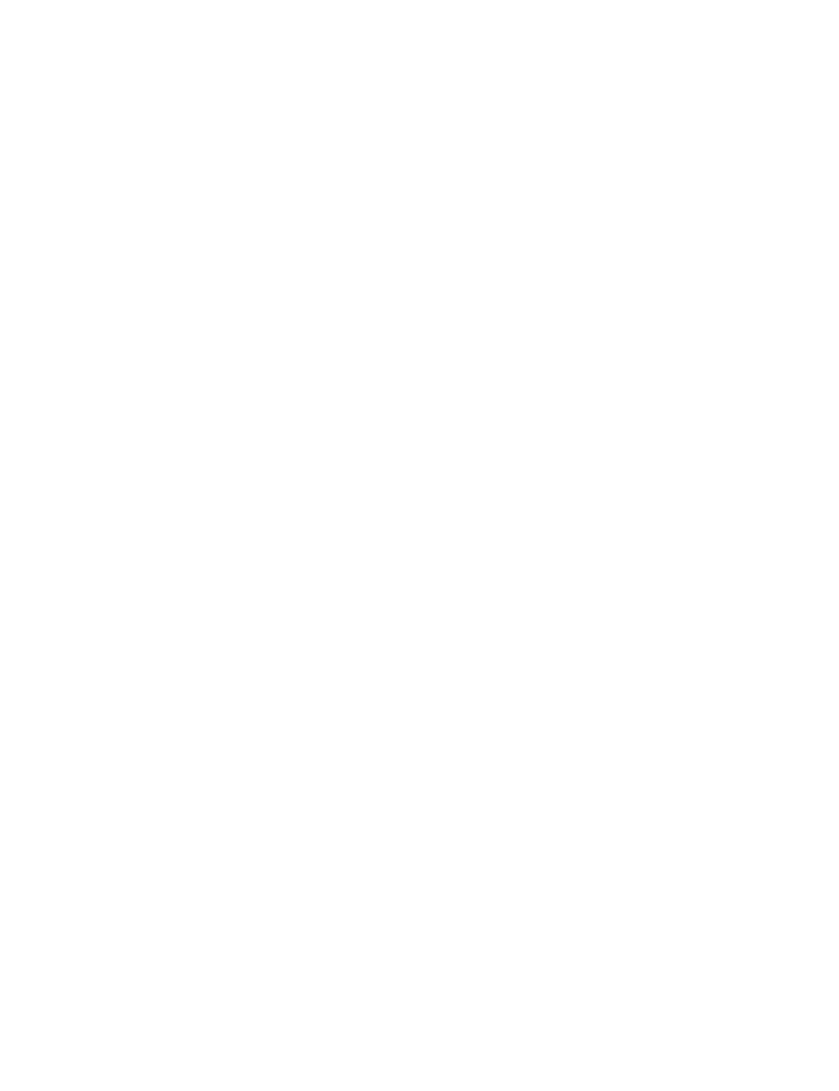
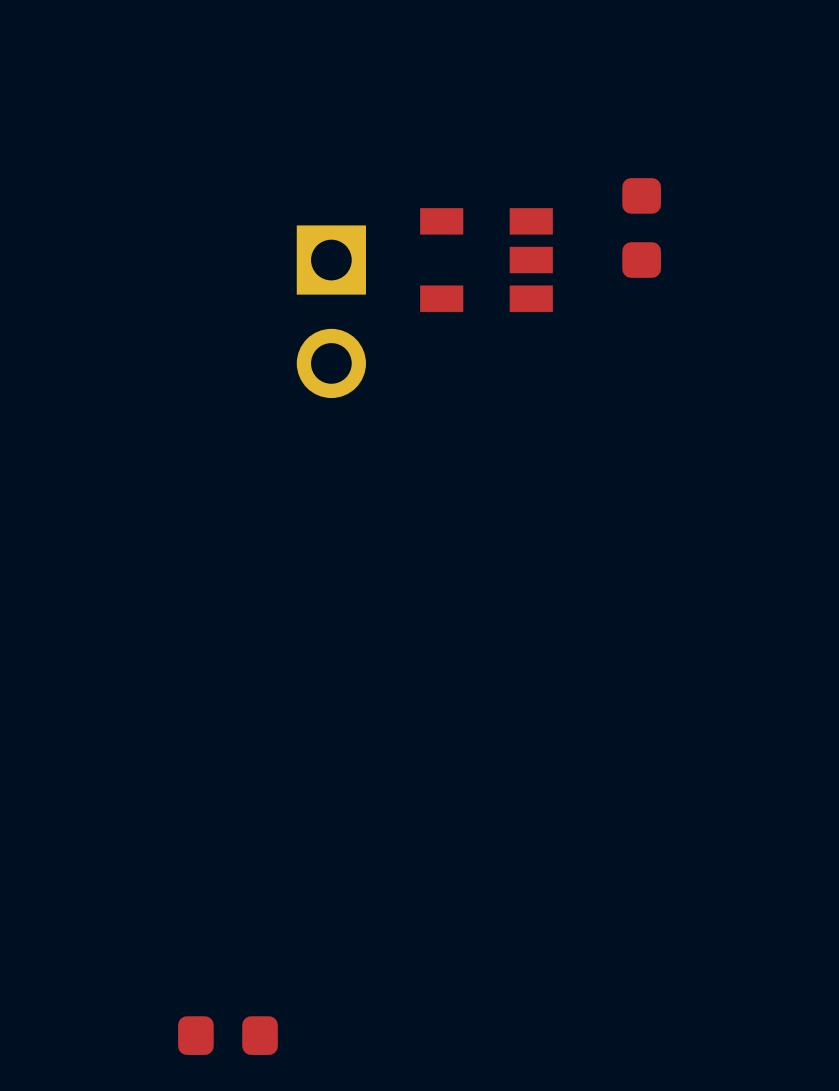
part: none -> (641, 227)
part: none -> (486, 260)
part: none -> (331, 311)
part: none -> (227, 1035)

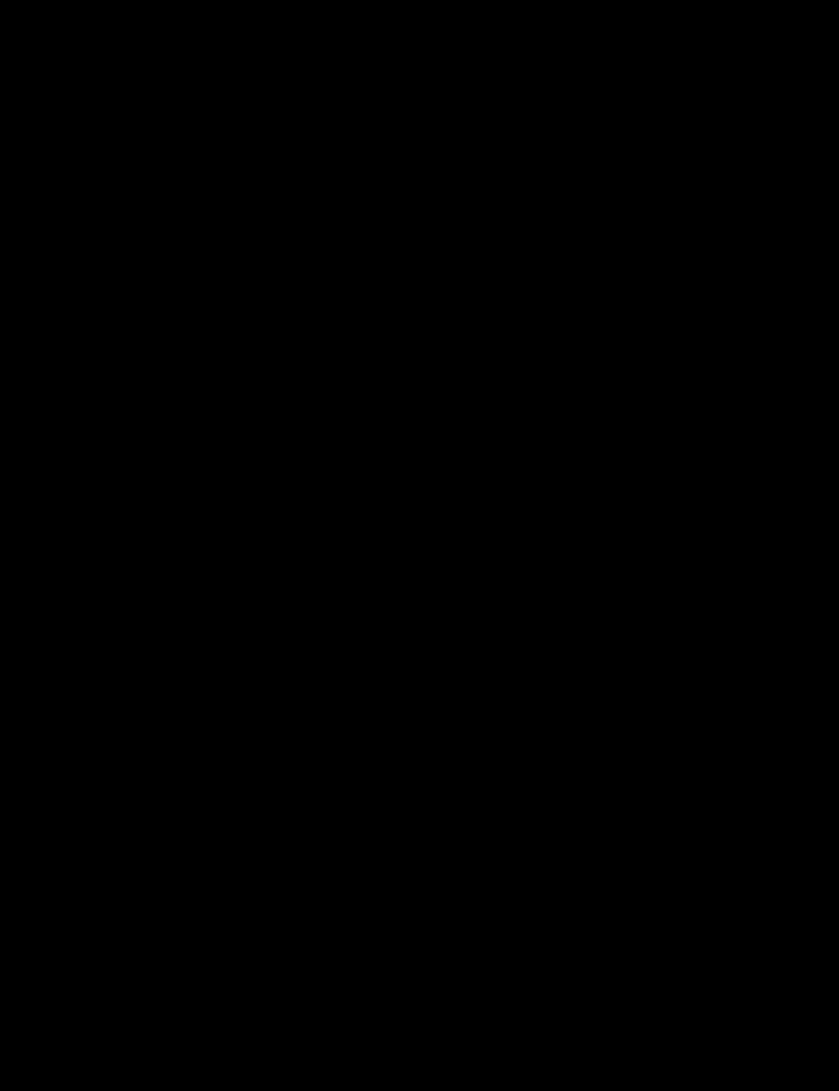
part: (641, 227) -> none
part: (486, 260) -> none
part: (331, 311) -> none
part: (227, 1035) -> none

